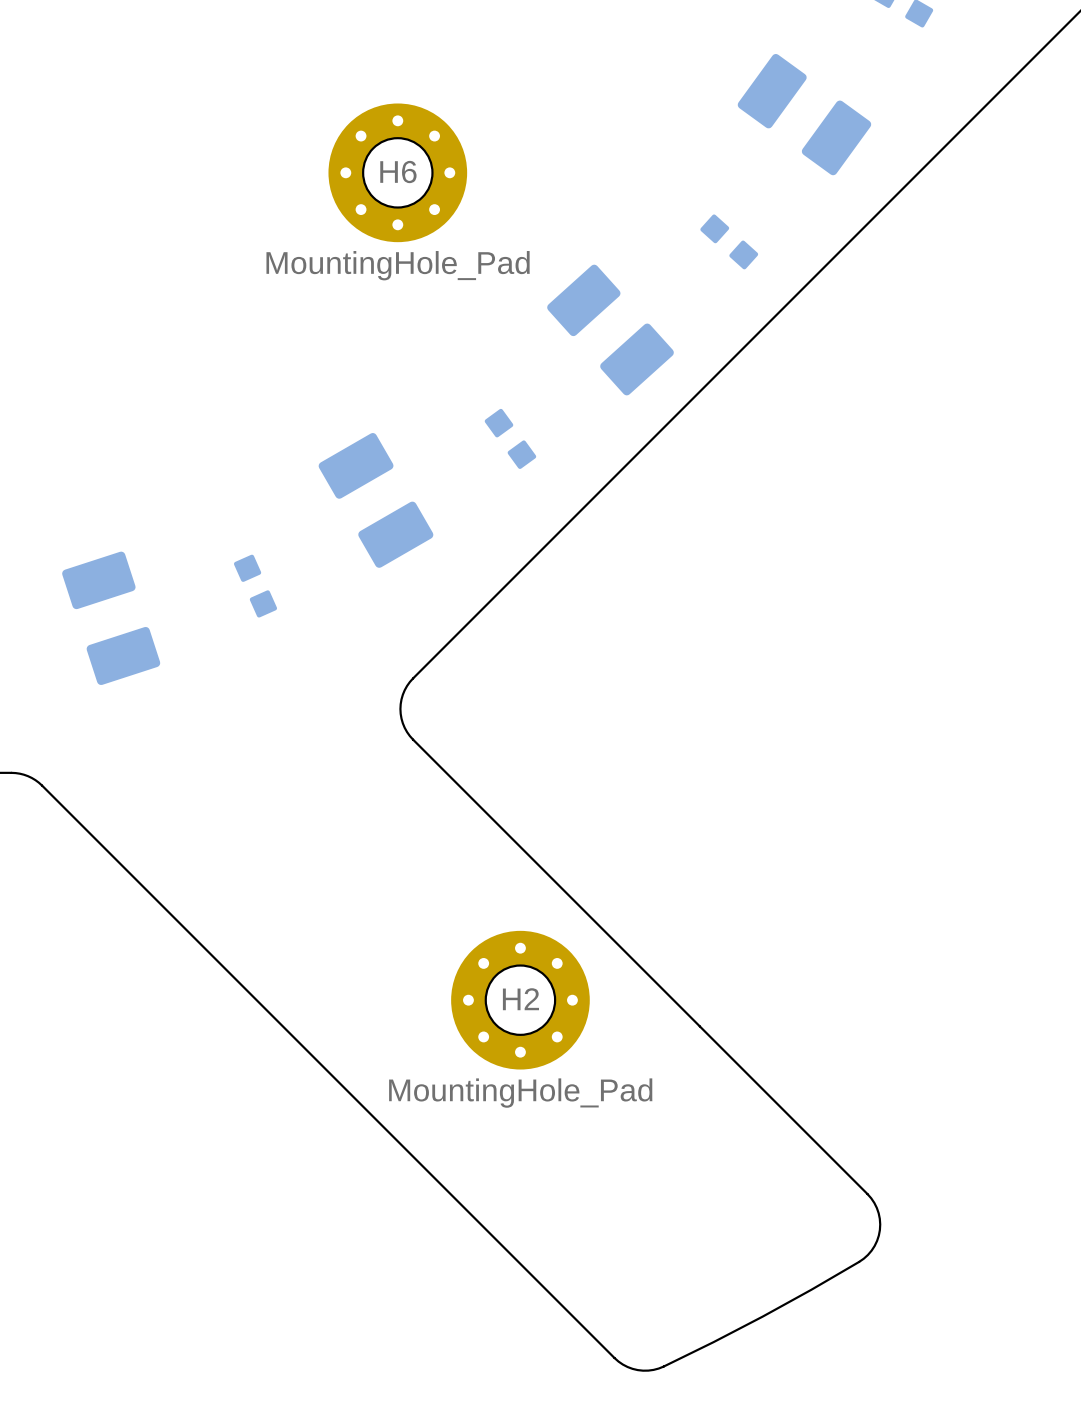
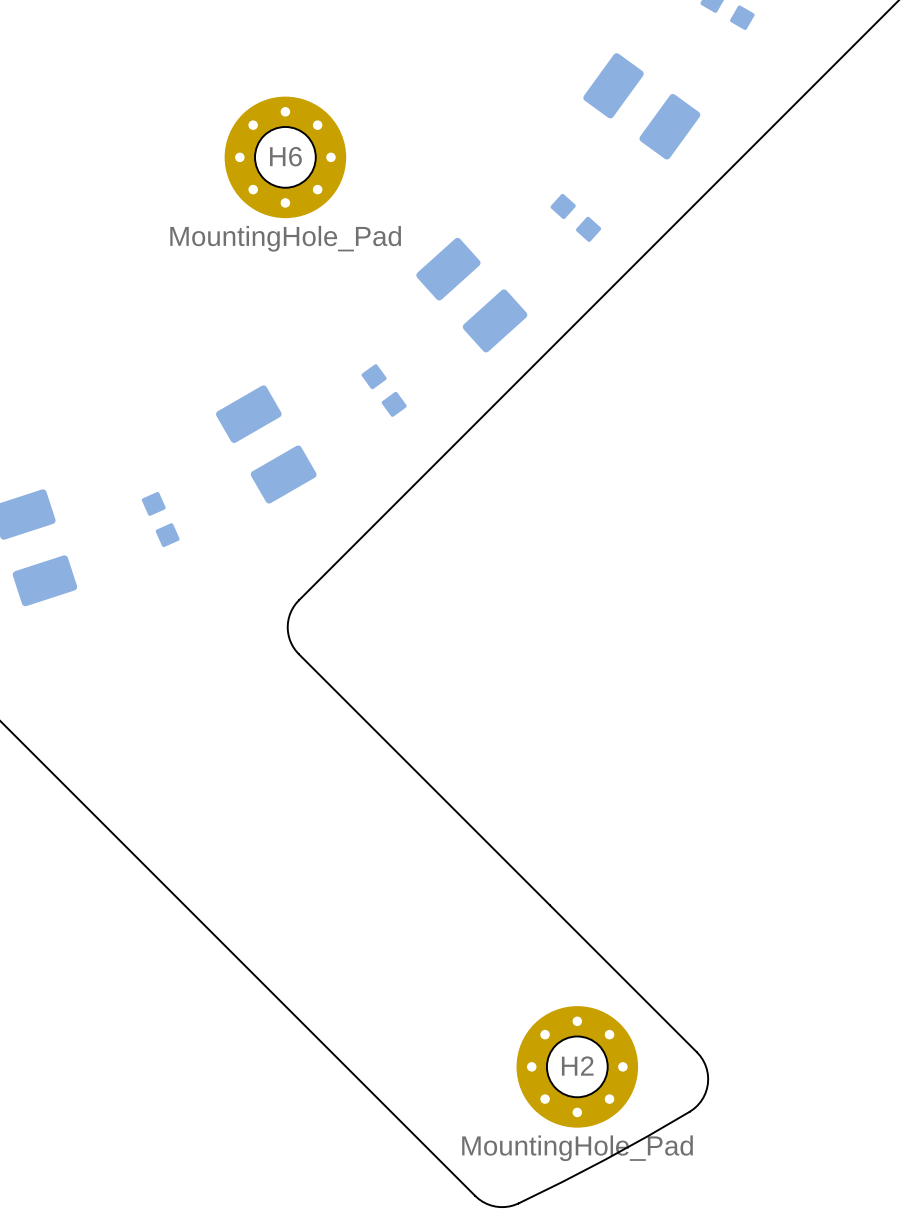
H2 position: (520, 1000) -> (577, 1066)
round board edge position: (520, 1000) -> (577, 1066)

